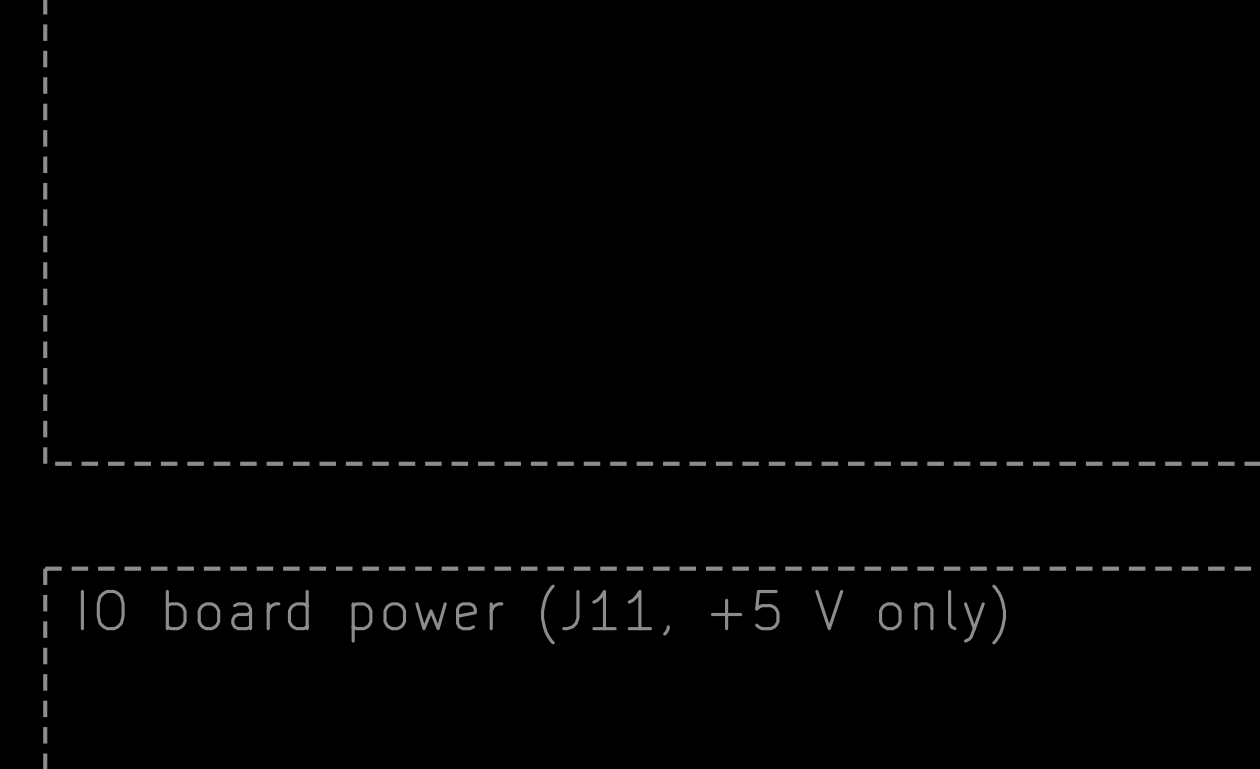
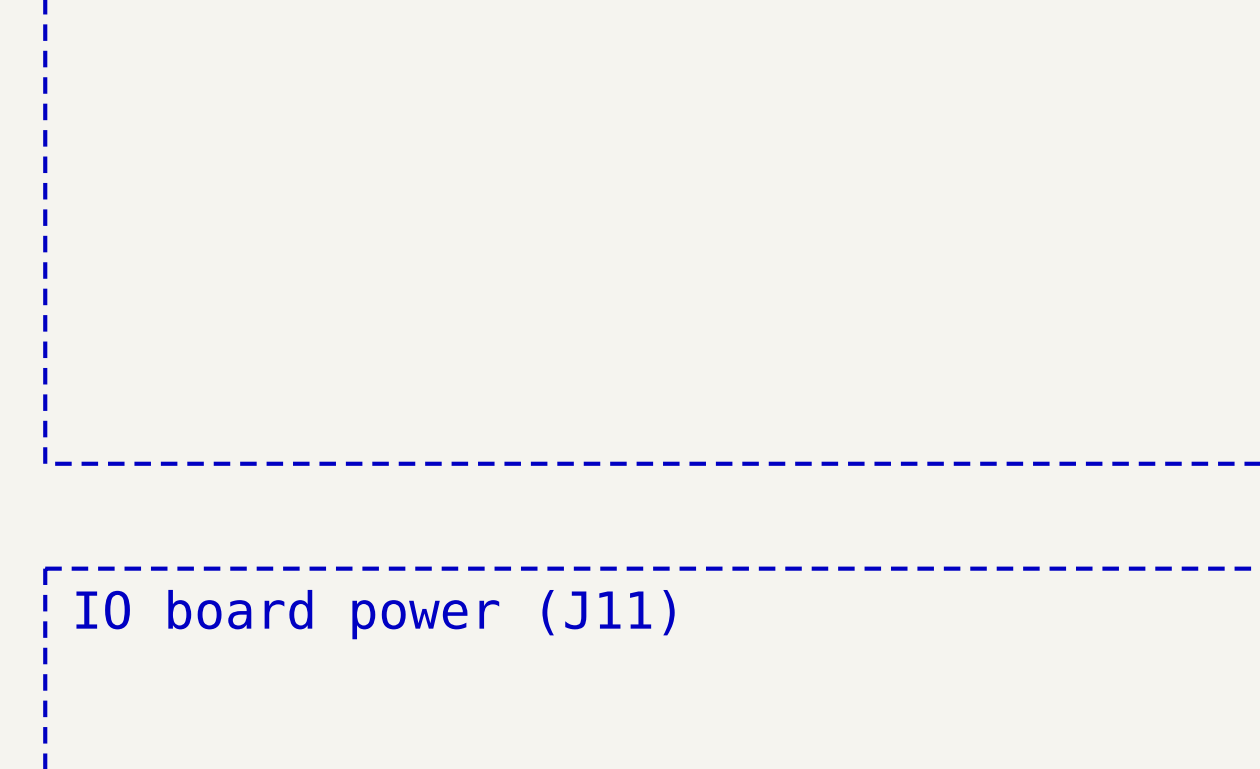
text: IO board power (J11, +5 V only) (543, 614) -> IO board power (J11) (375, 614)

